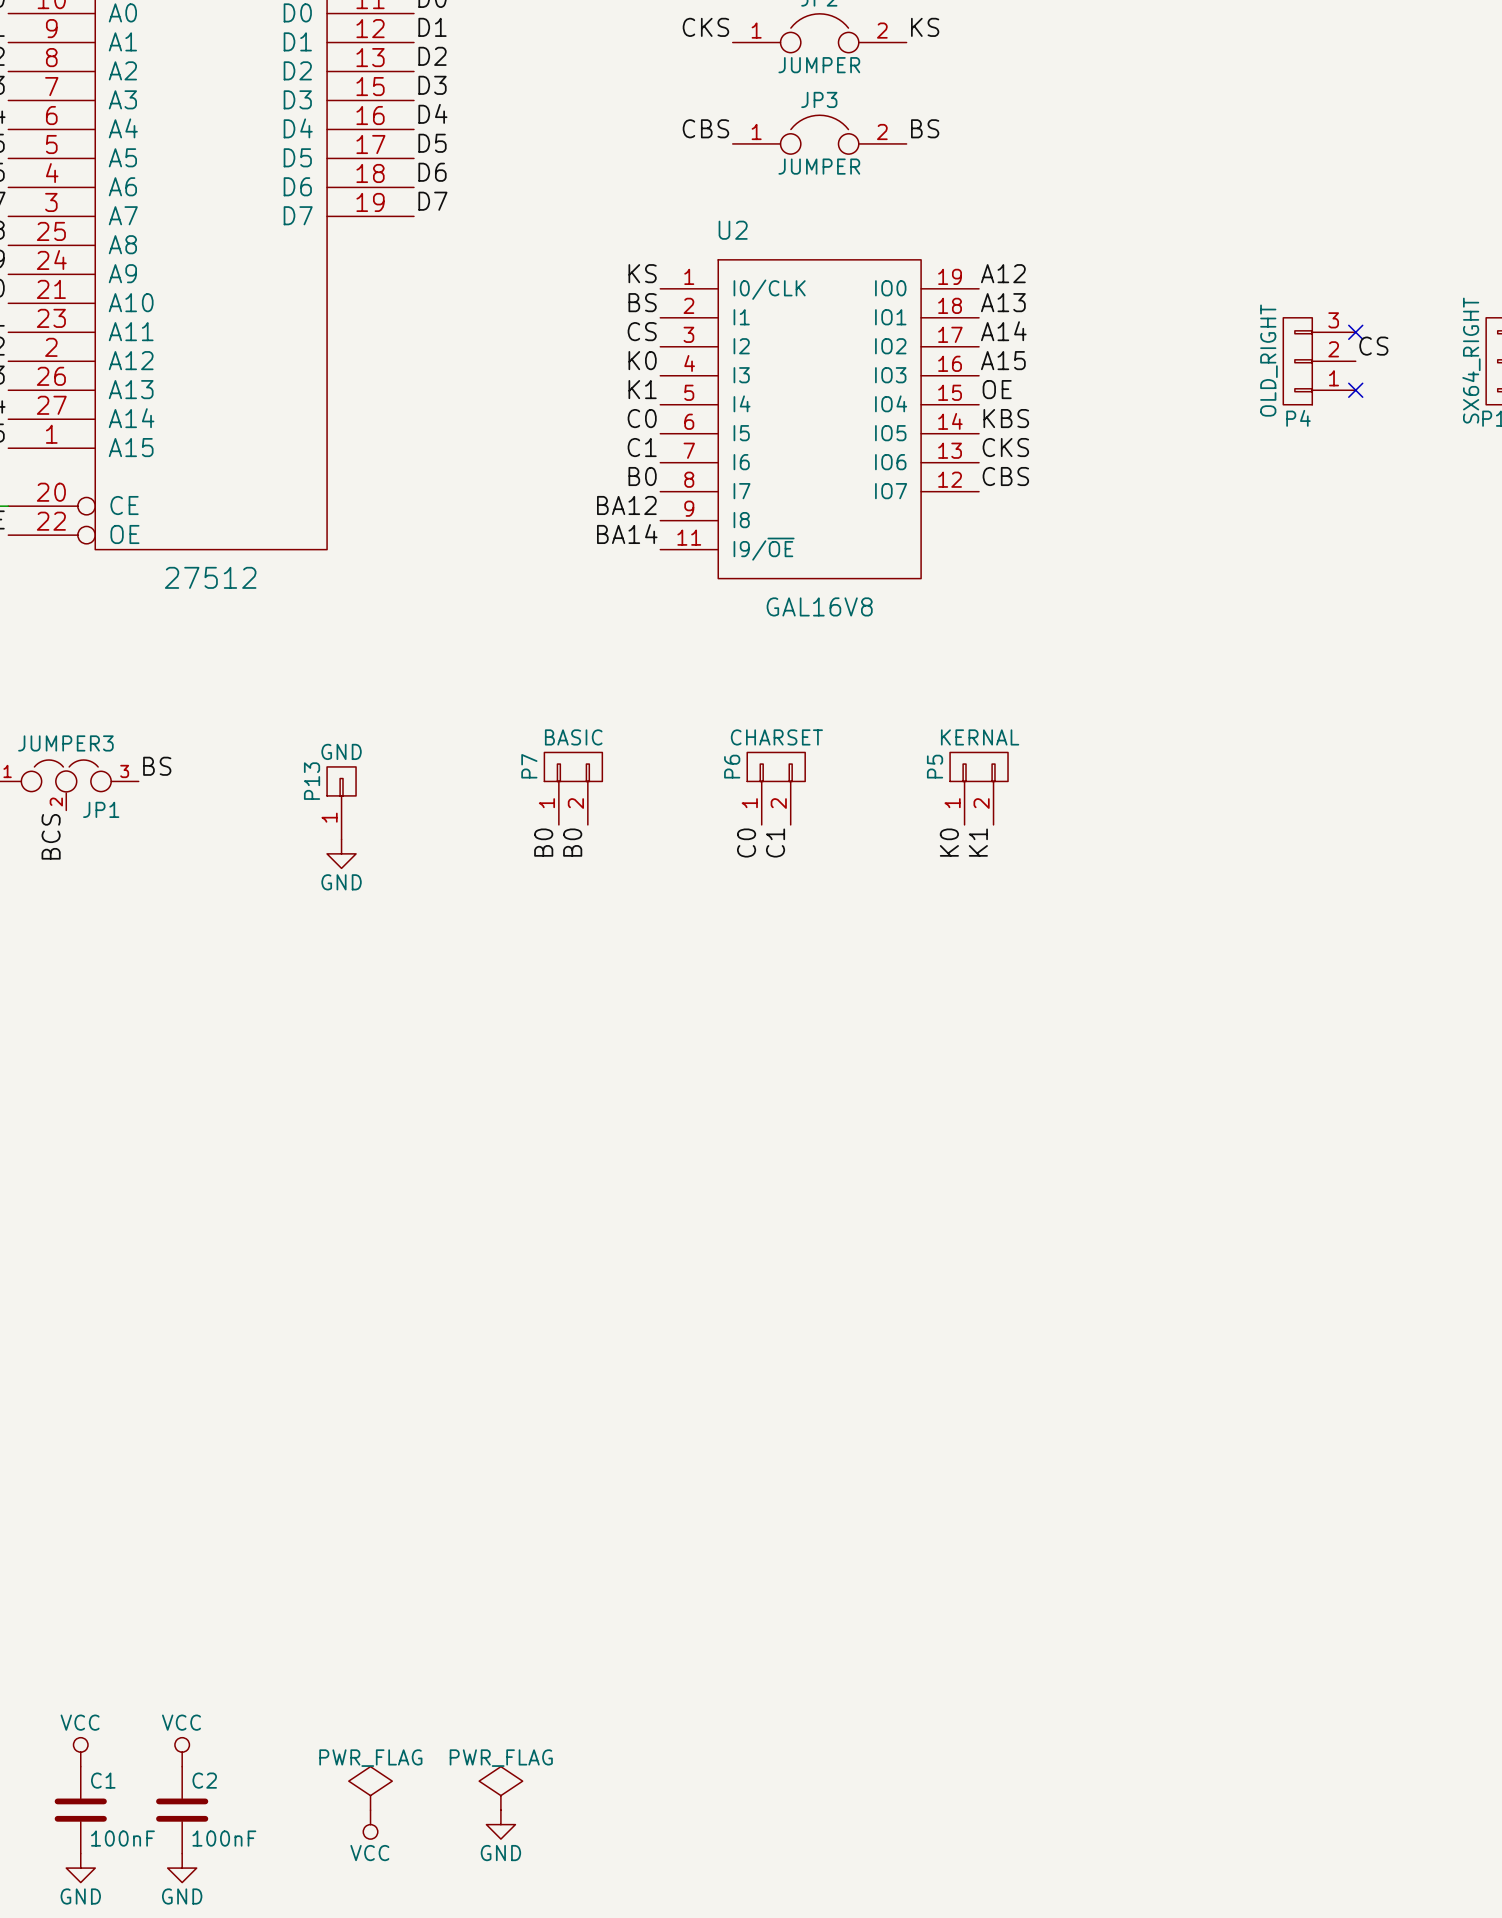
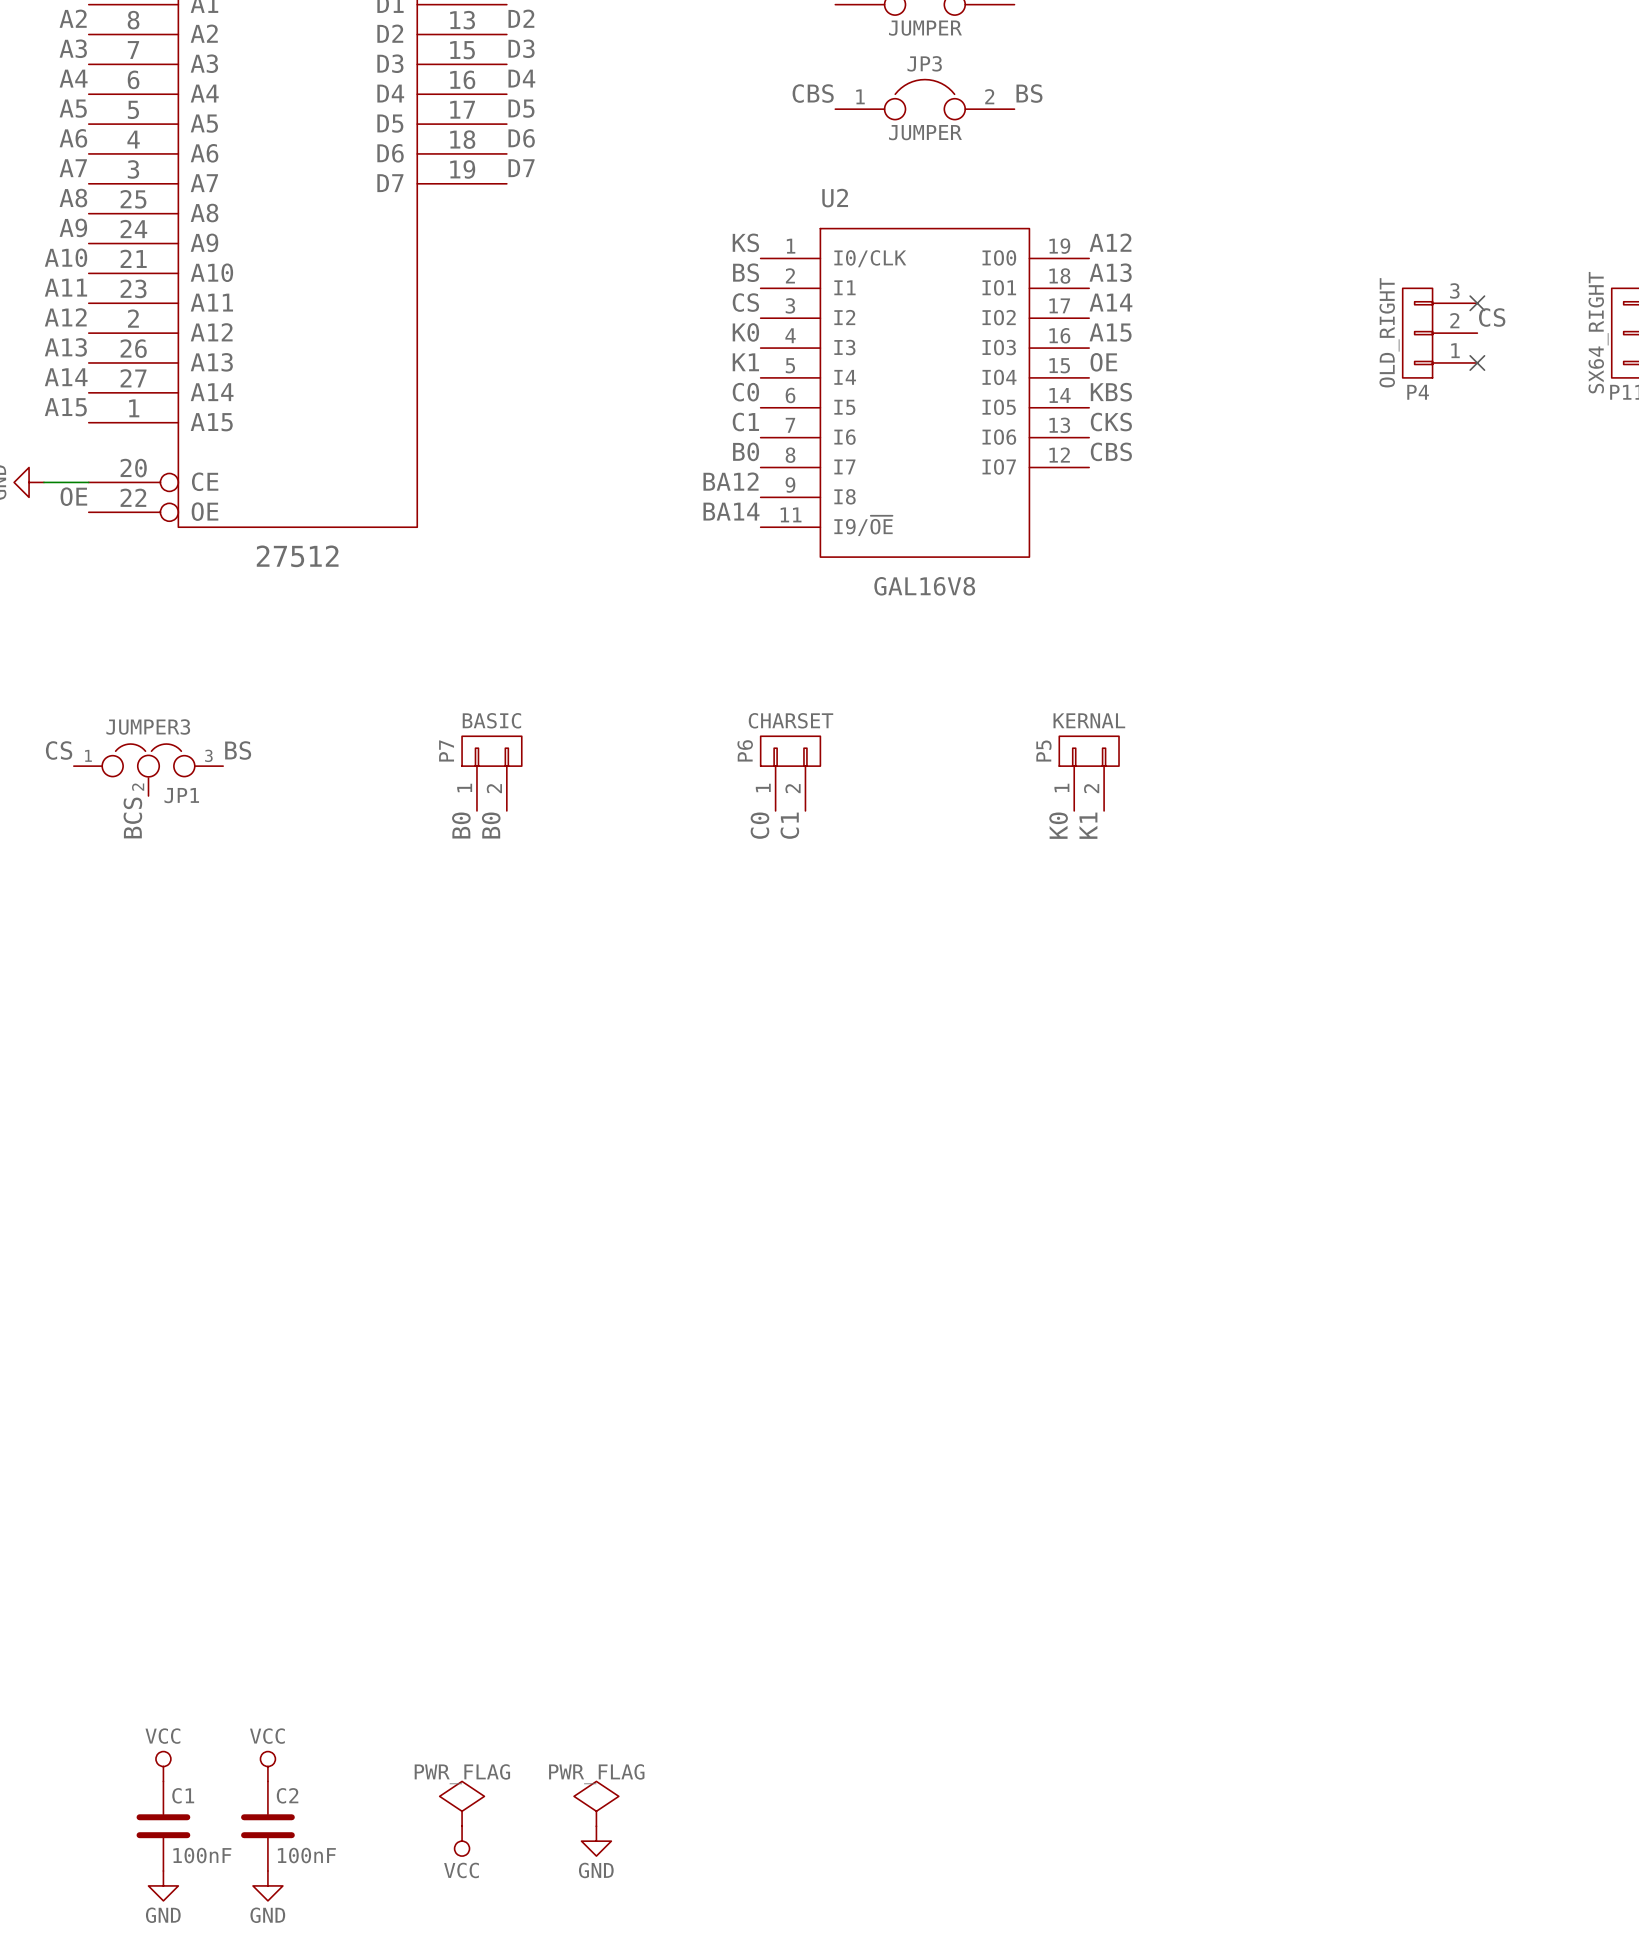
P7 position: (573, 788) -> (491, 773)
P6 position: (776, 788) -> (790, 773)
P13: GND (341, 803) -> none
label: none -> B0 (461, 825)
label: none -> B0 (491, 825)
label: B0 (543, 842) -> none
label: B0 (572, 842) -> none
label position: C0 (746, 843) -> C0 (759, 825)
label position: C1 (775, 843) -> C1 (789, 825)
power symbol: GND (341, 853) -> none

